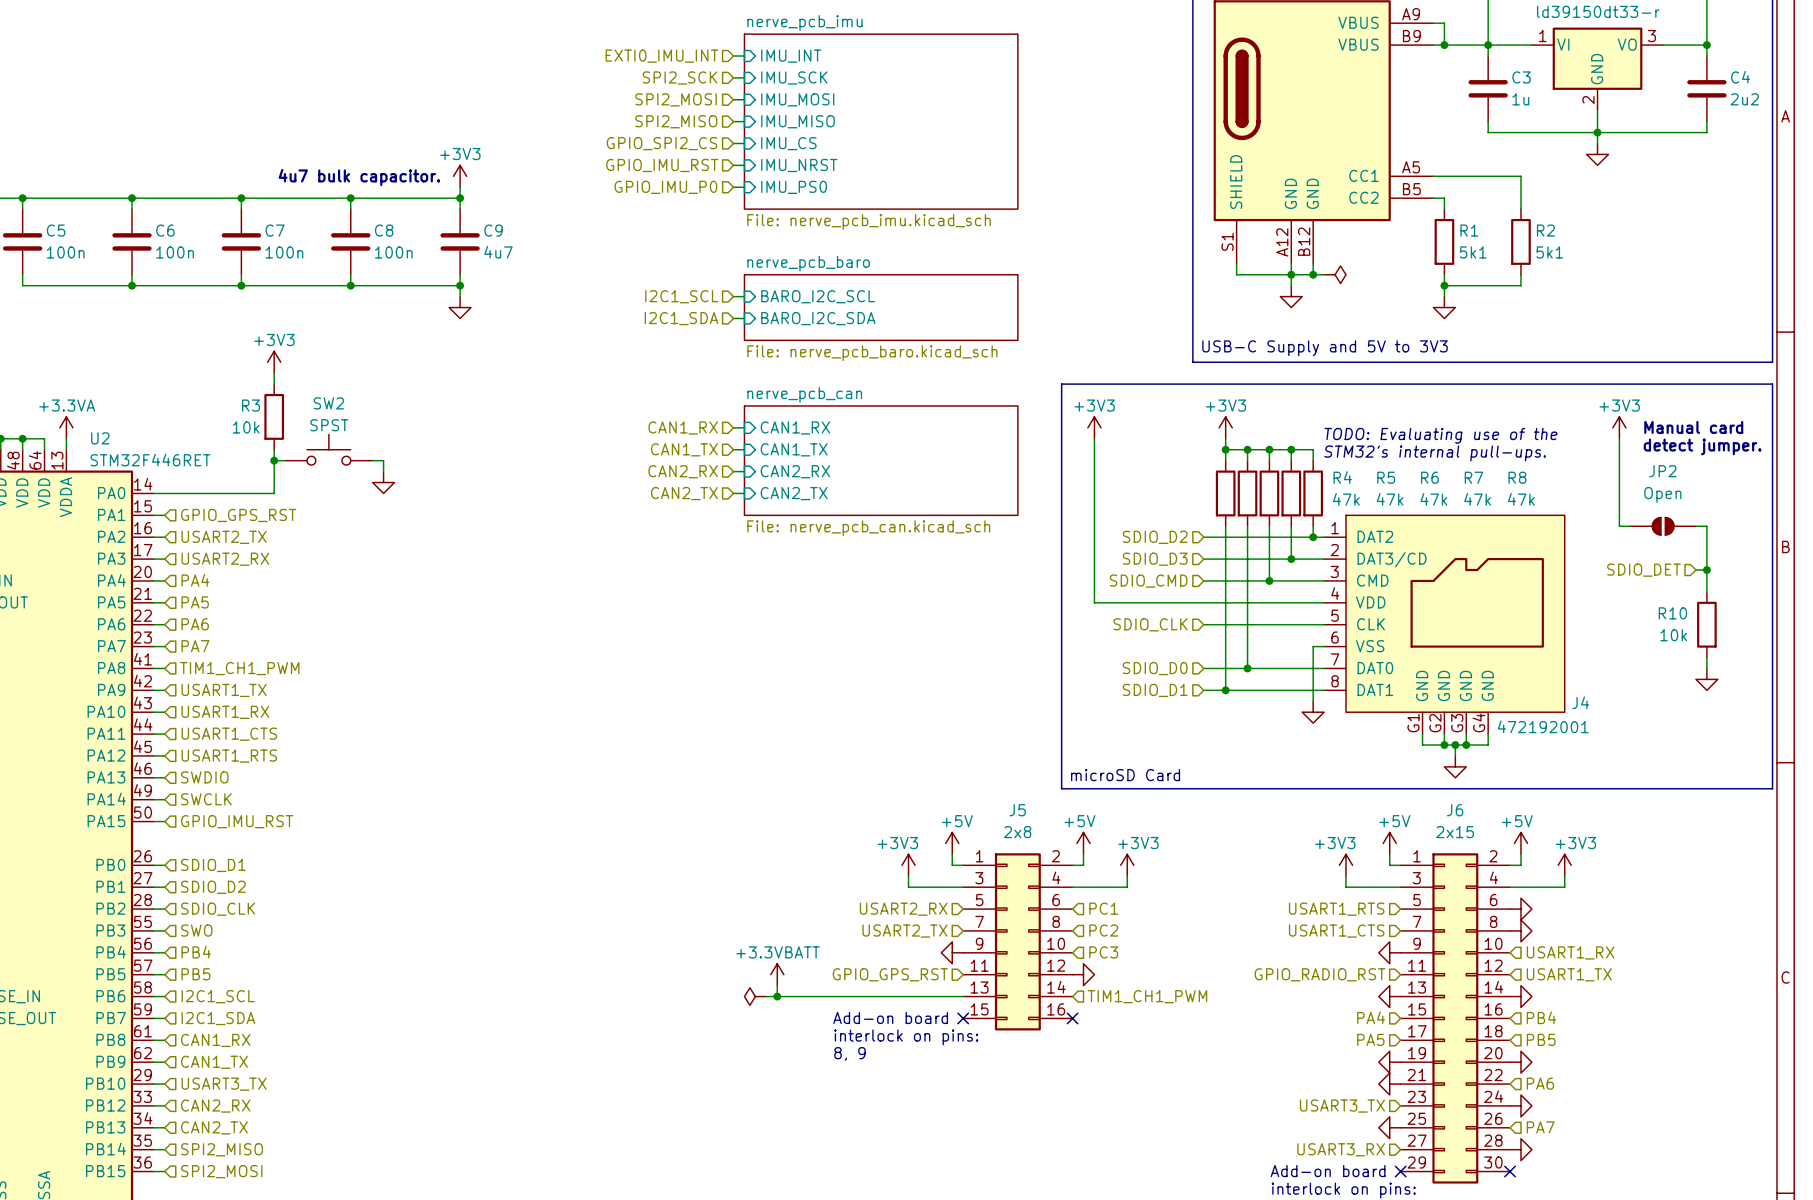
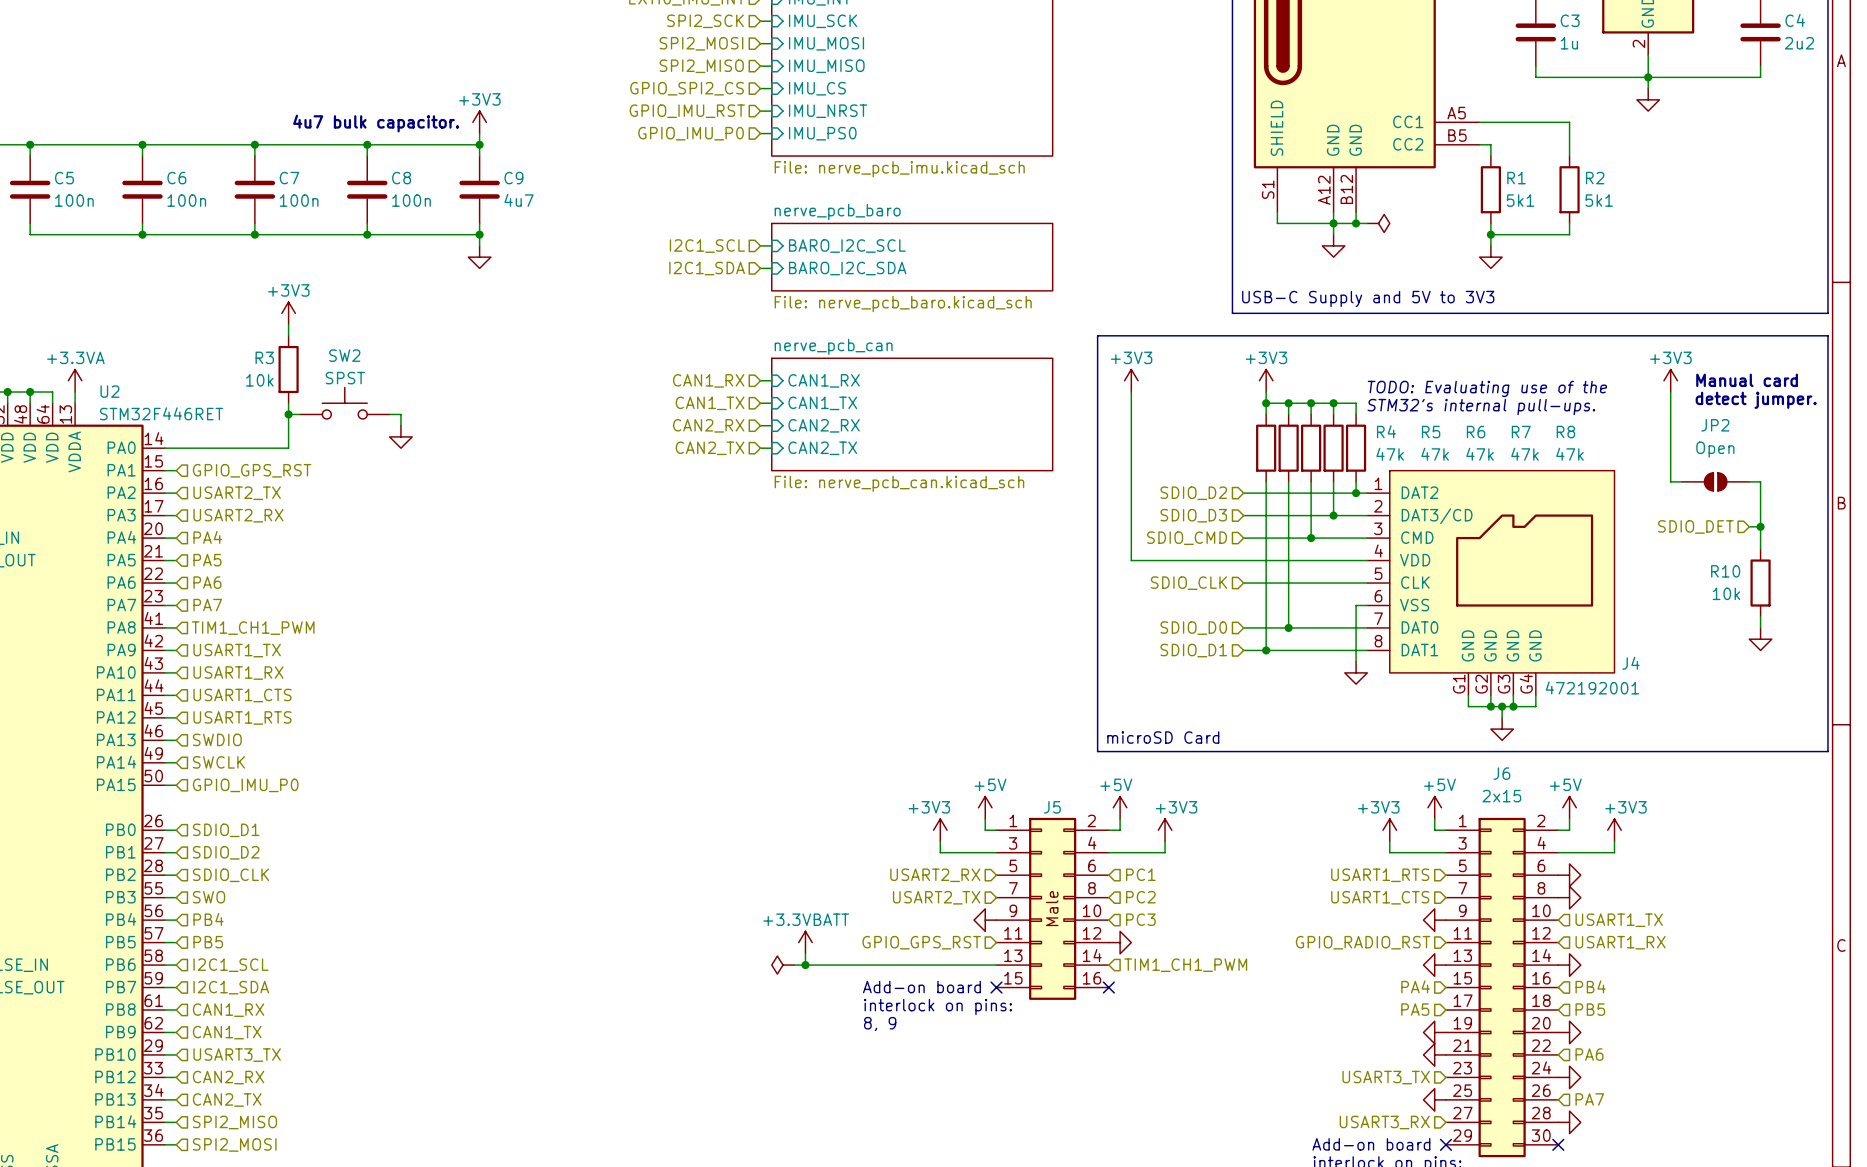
J5 name position: J5 (1017, 810) -> J5 (1052, 807)
hierarchical label: GPIO_IMU_RST (237, 821) -> GPIO_IMU_P0 (245, 785)
J5 value: 2x8 (1017, 832) -> none
J5 text: none -> Male (1052, 908)
hierarchical label: USART1_RX (1570, 952) -> USART1_TX (1619, 920)
hierarchical label: USART1_TX (1569, 974) -> USART1_RX (1620, 942)

